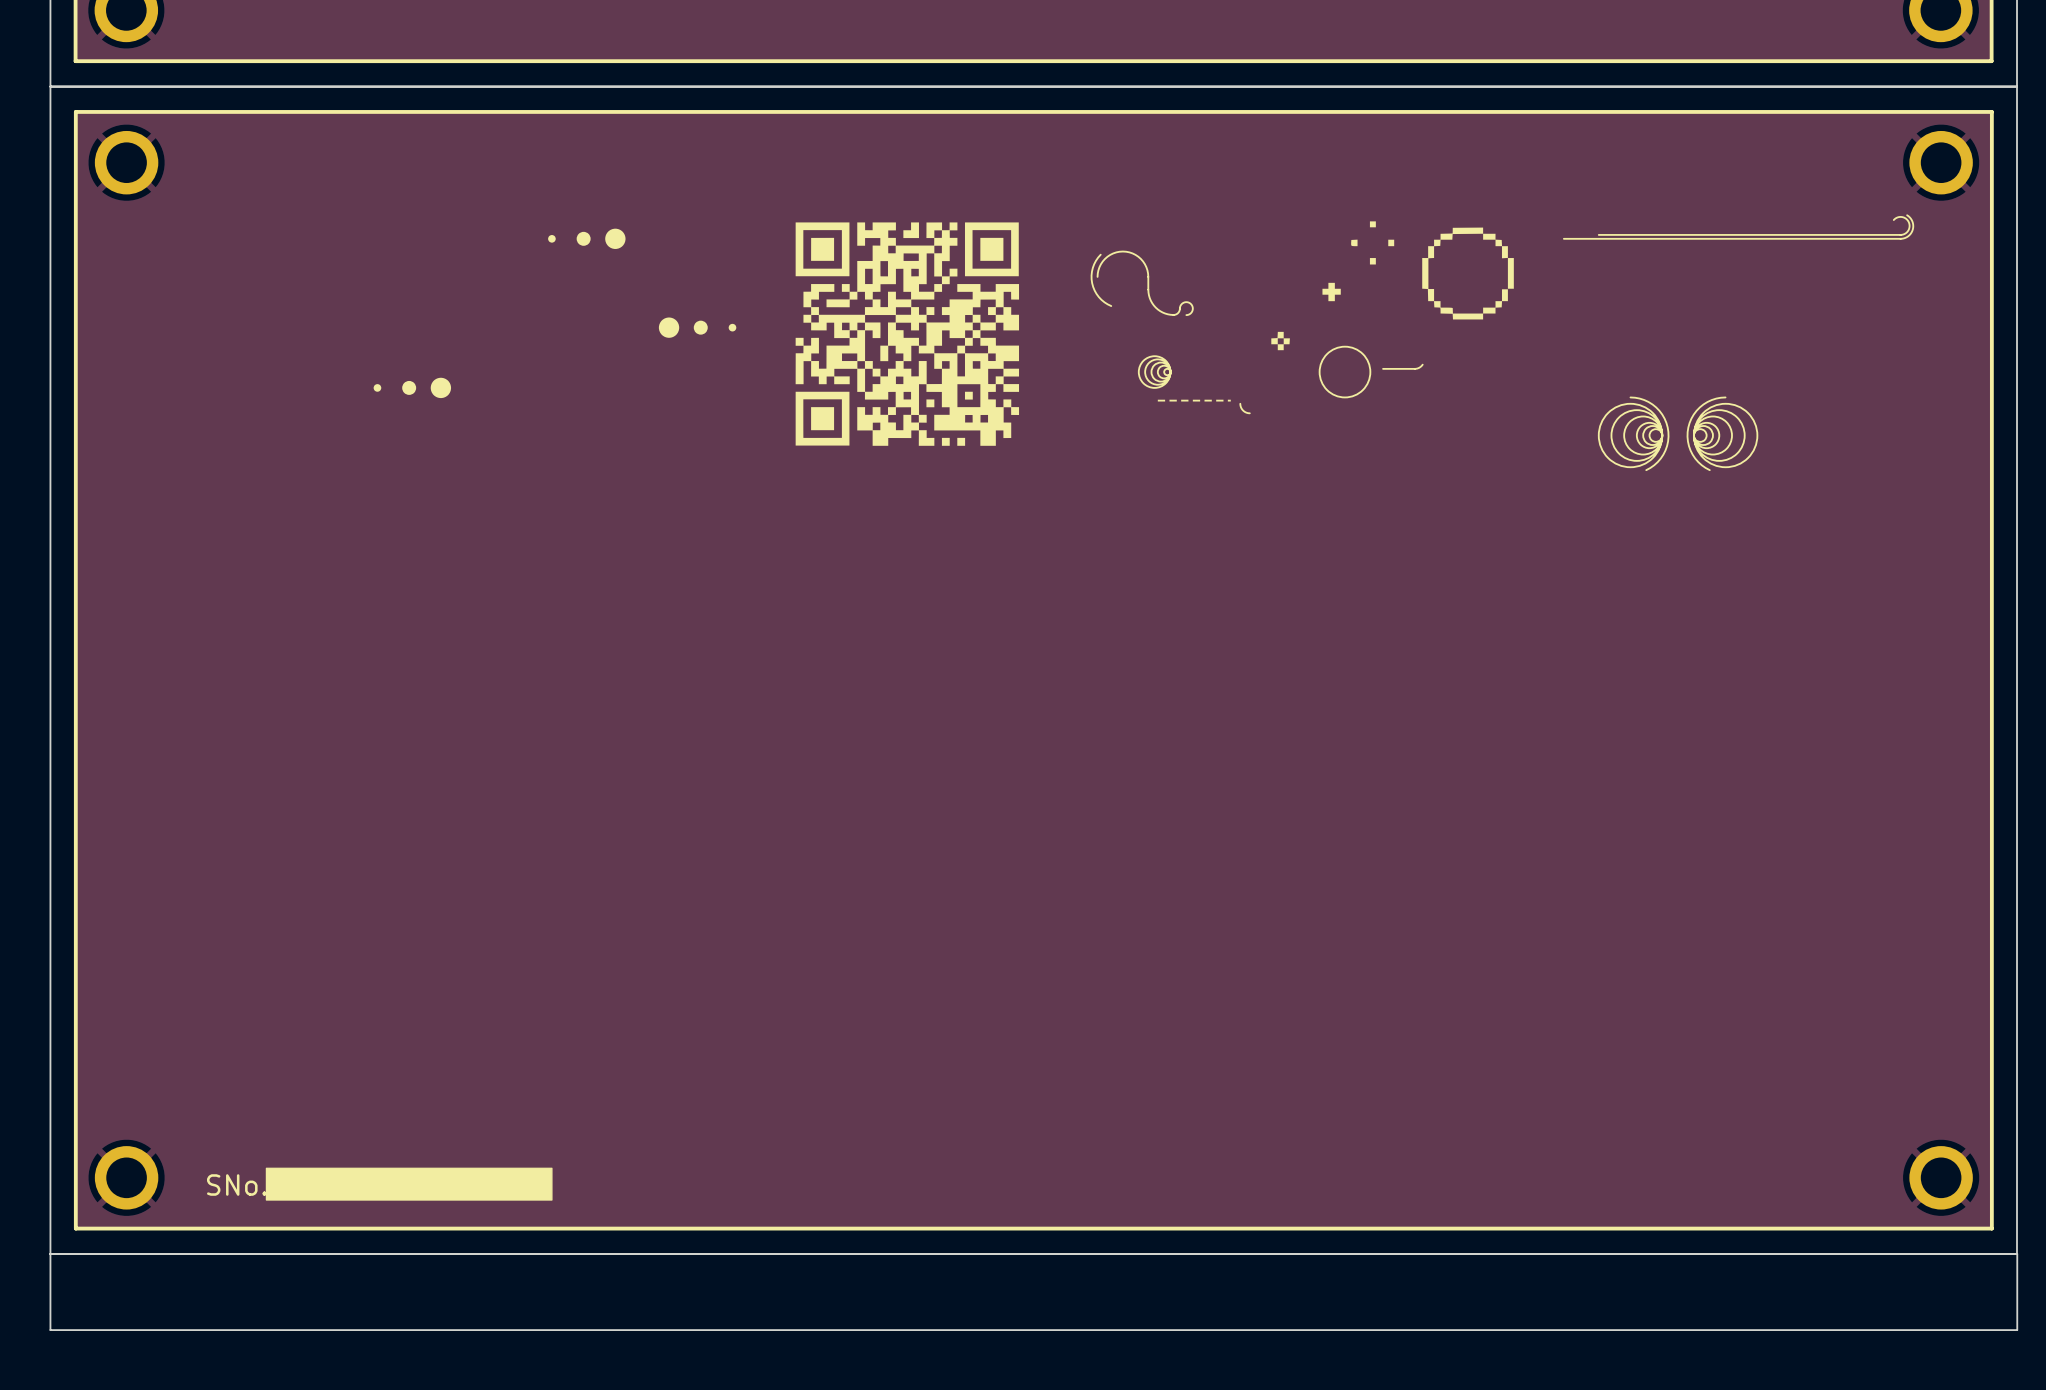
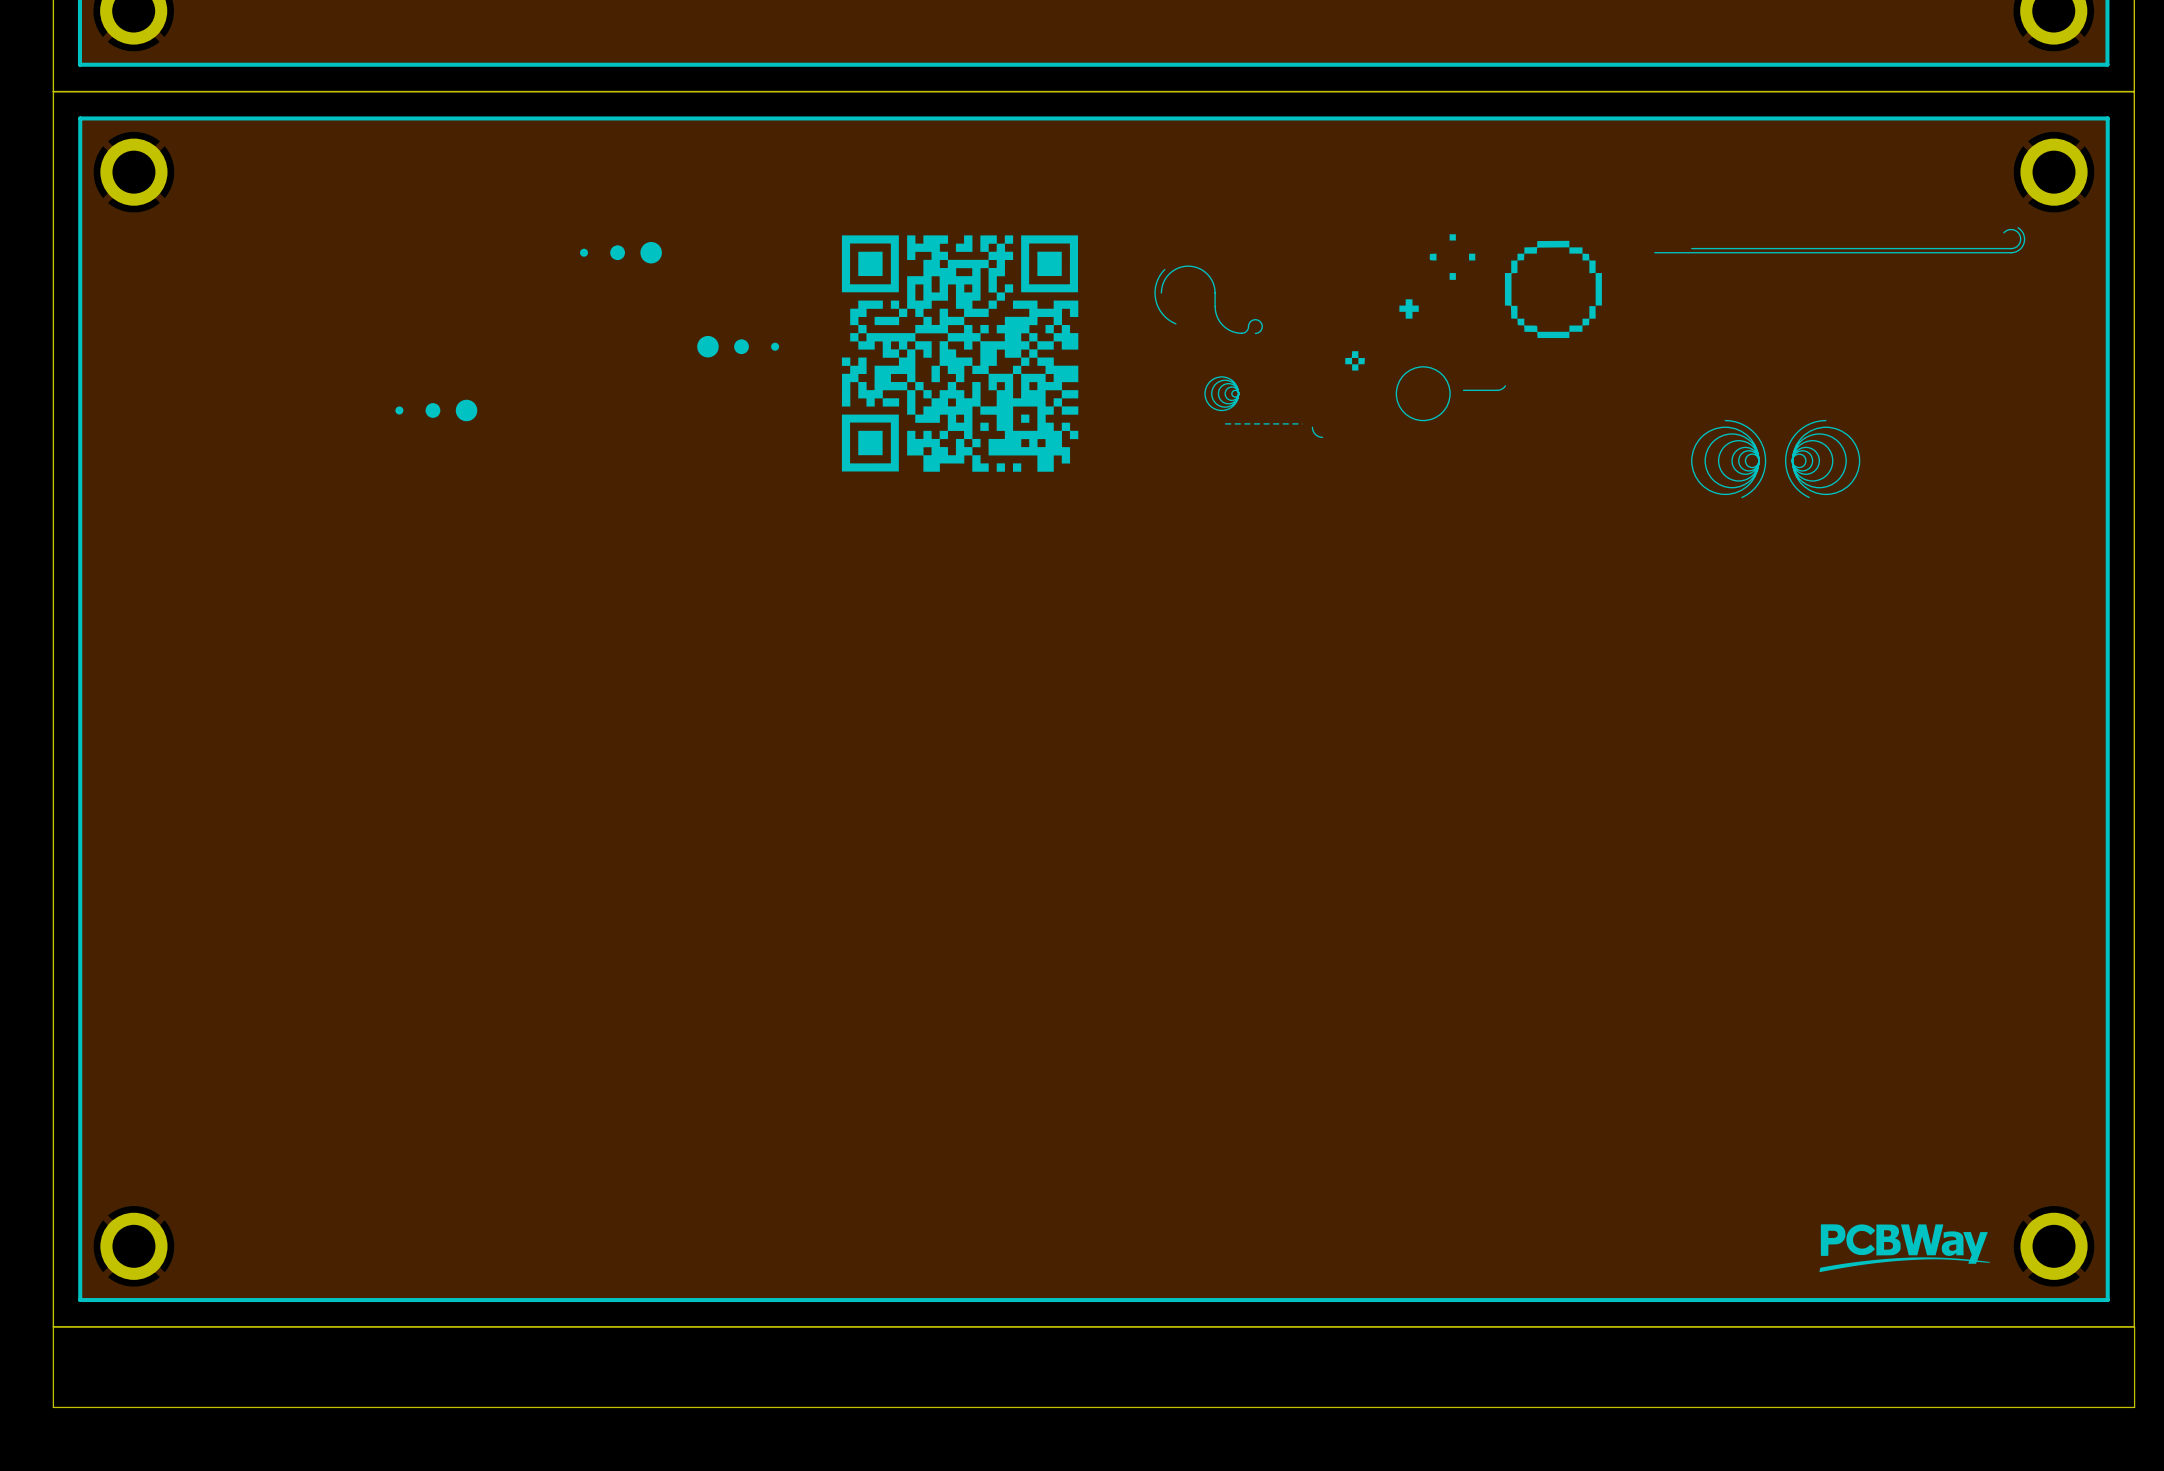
drawing: none -> [1819, 1224, 1991, 1273]
drawing: [265, 1167, 553, 1201] -> none
text: SNo. (236, 1185) -> none

